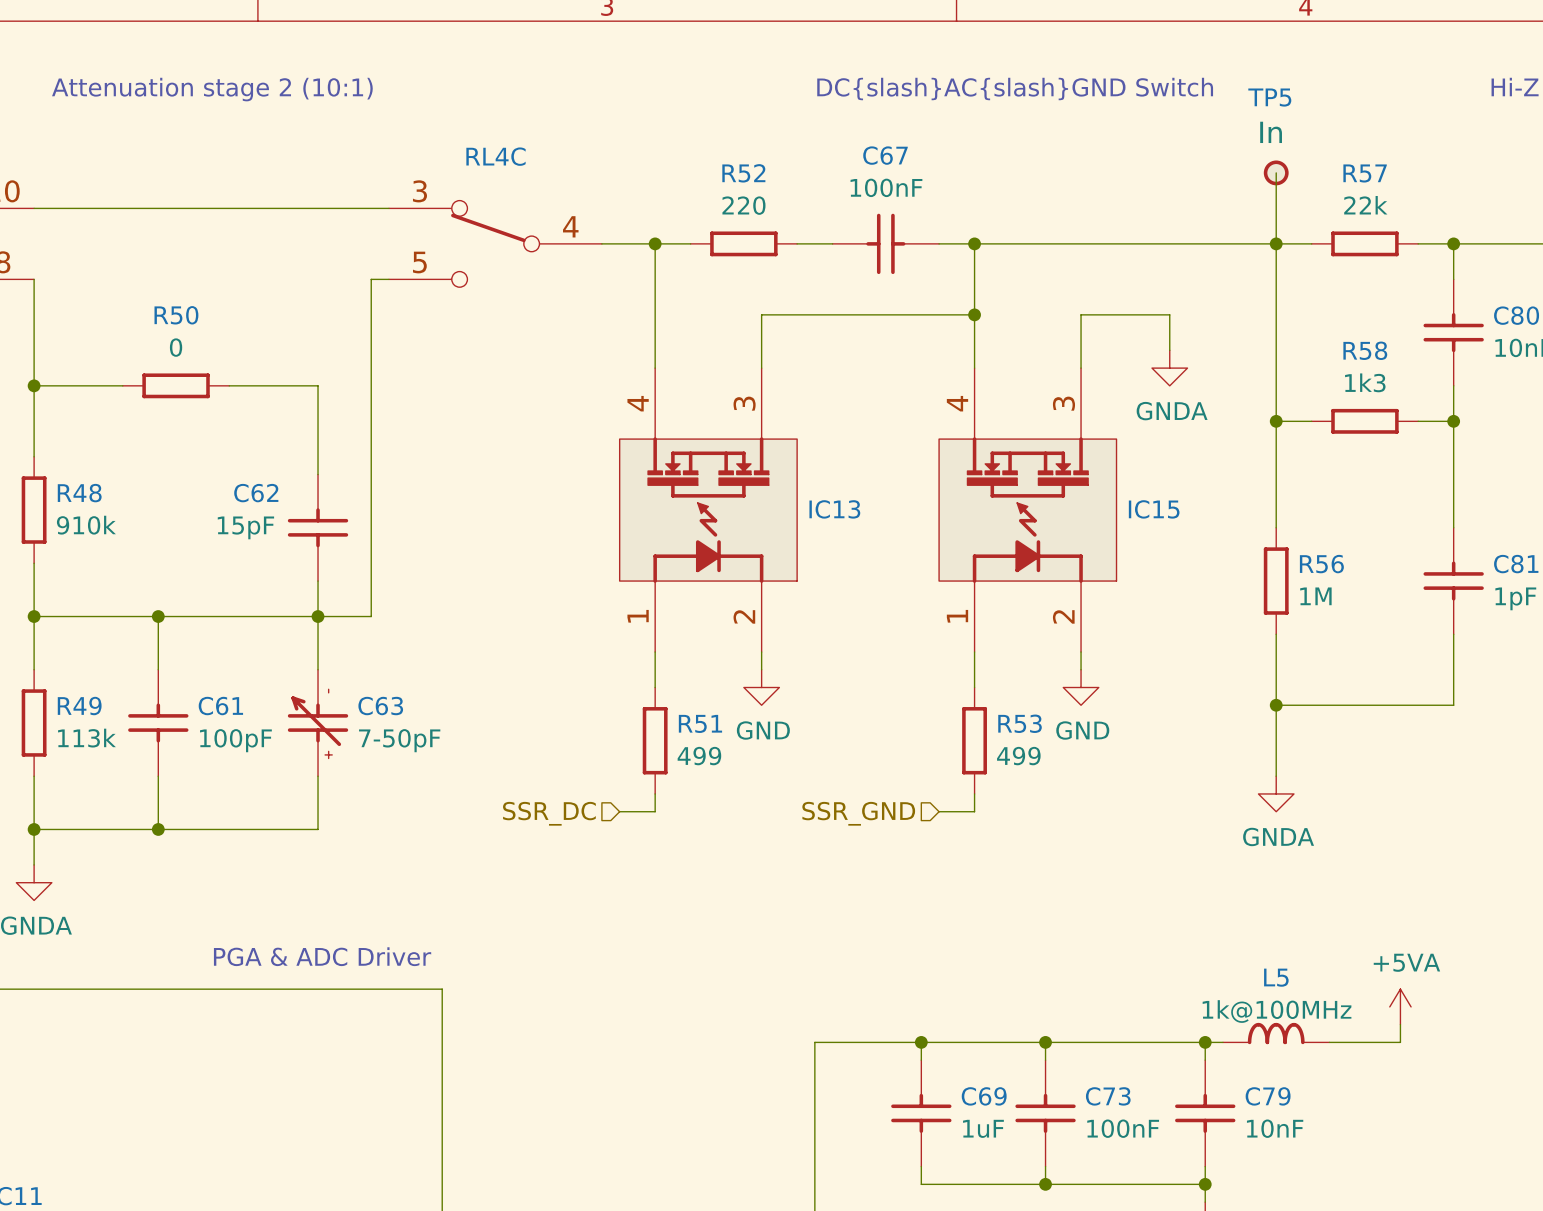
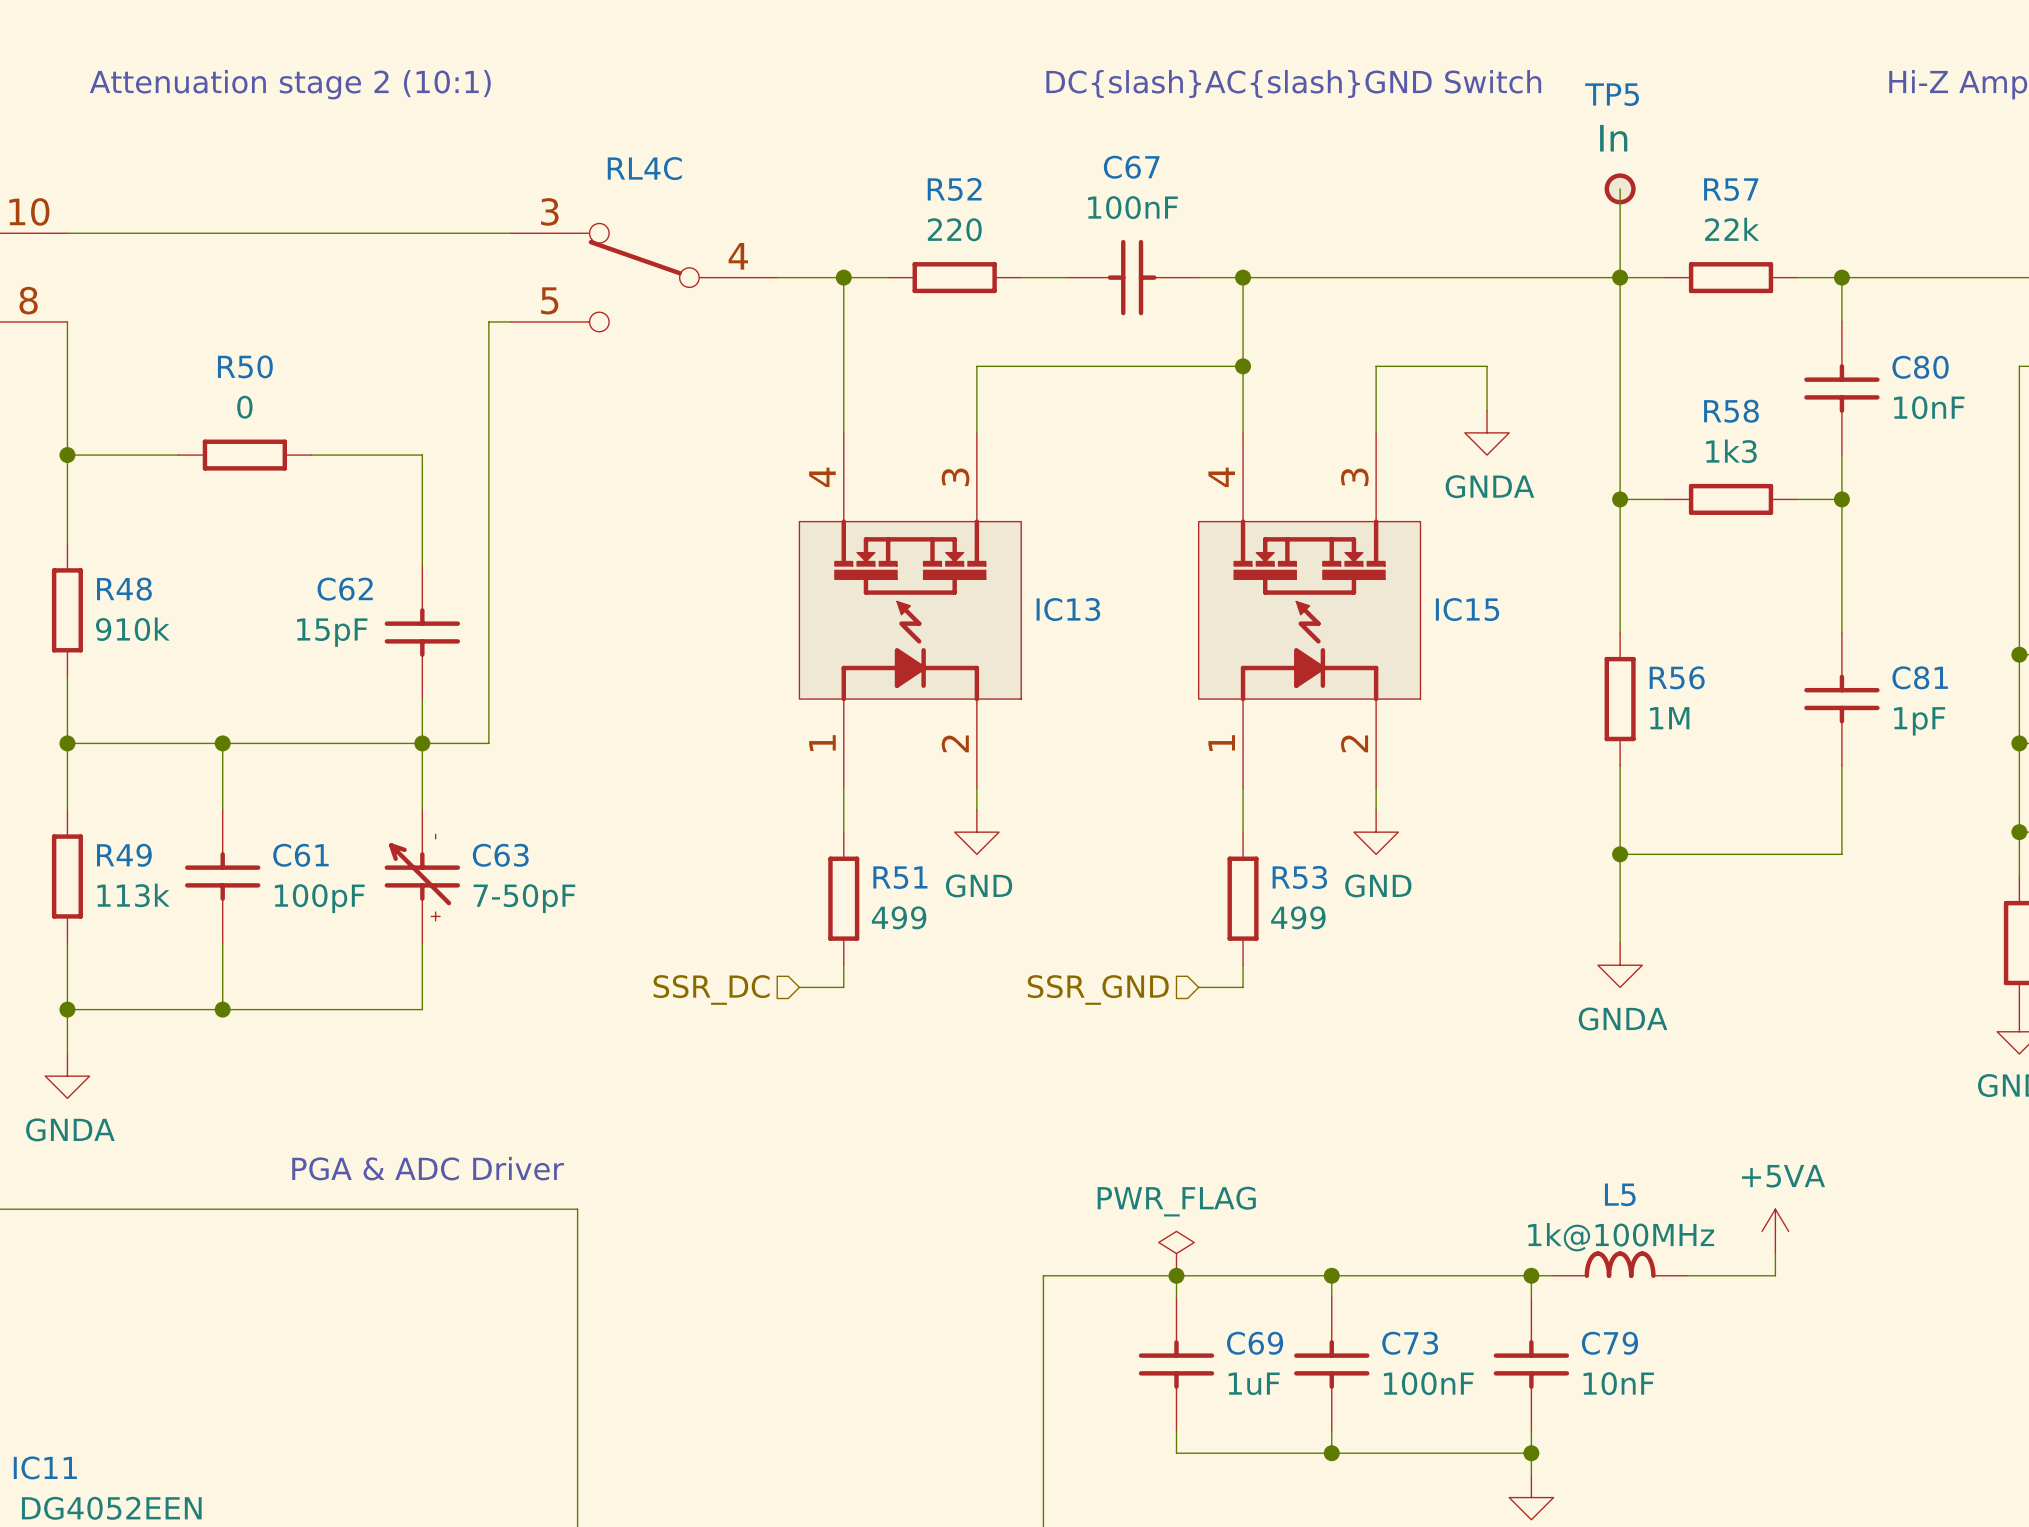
power symbol: none -> PWR_FLAG (1176, 1253)

